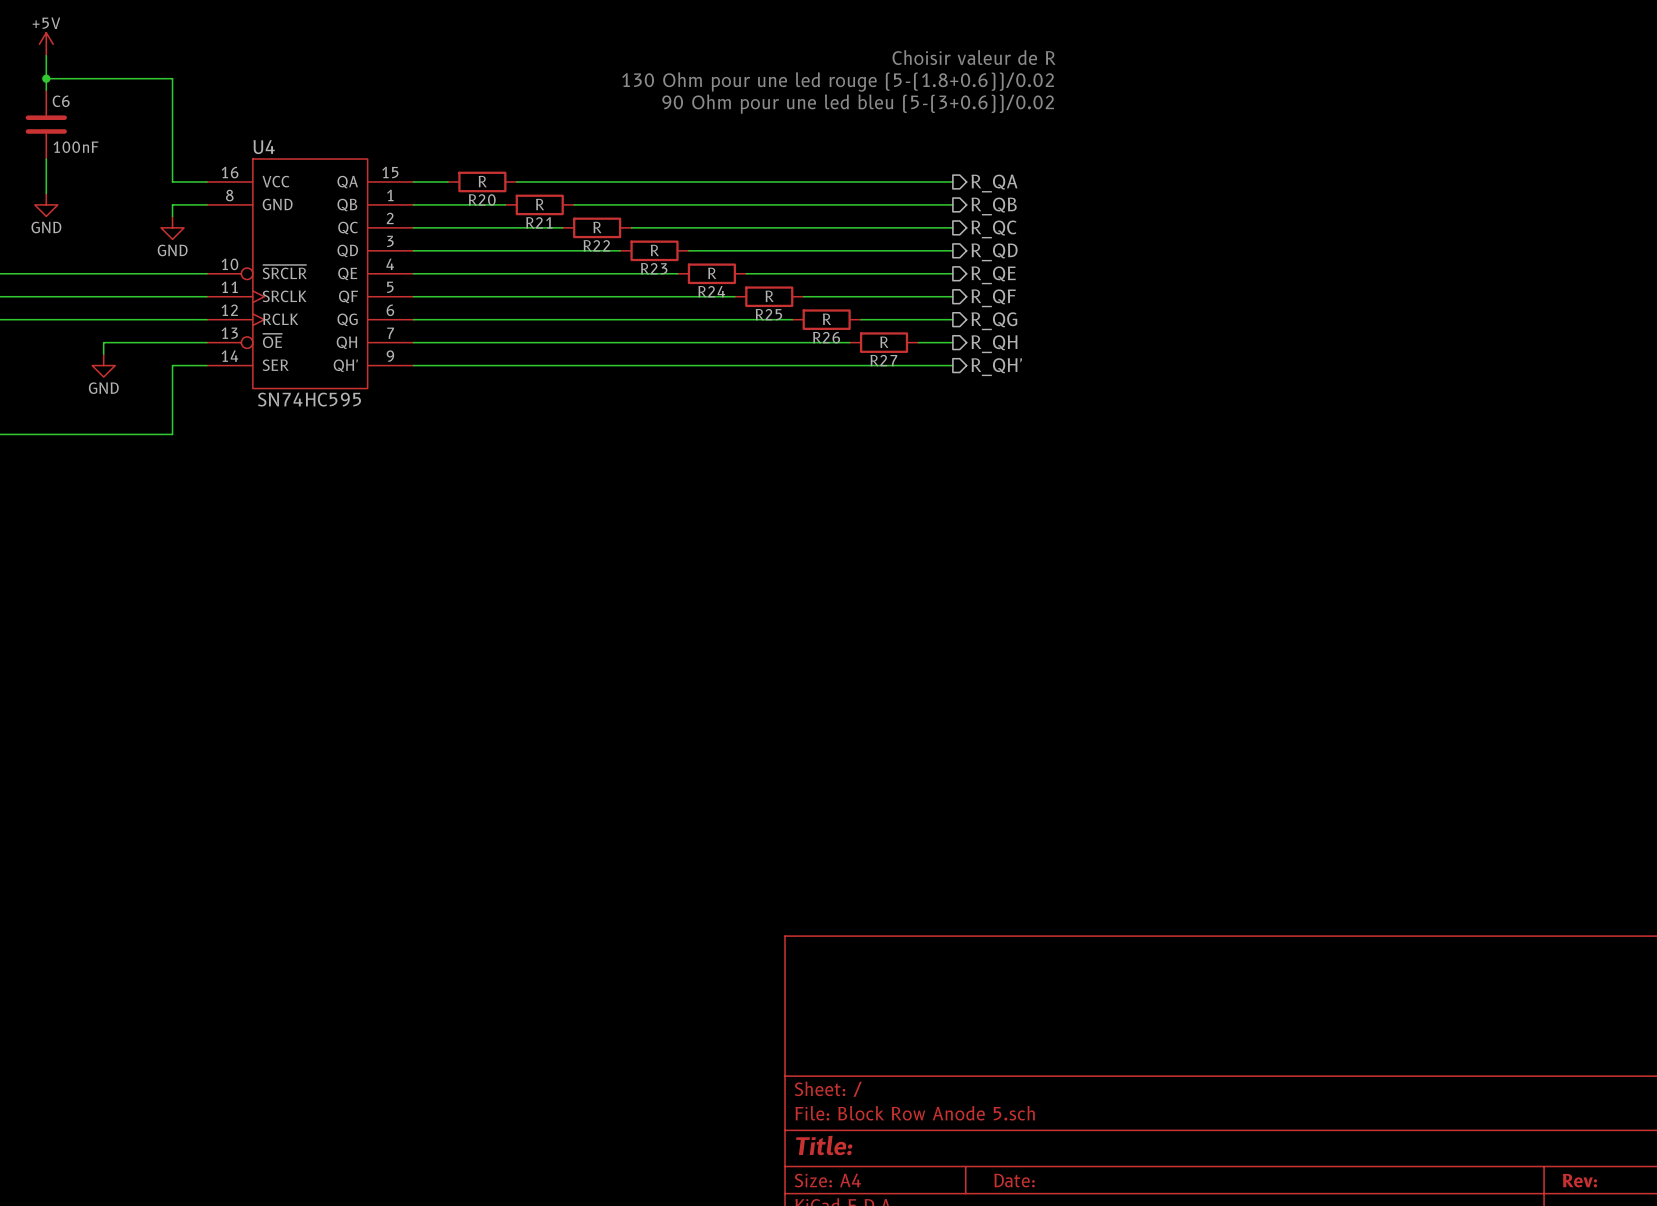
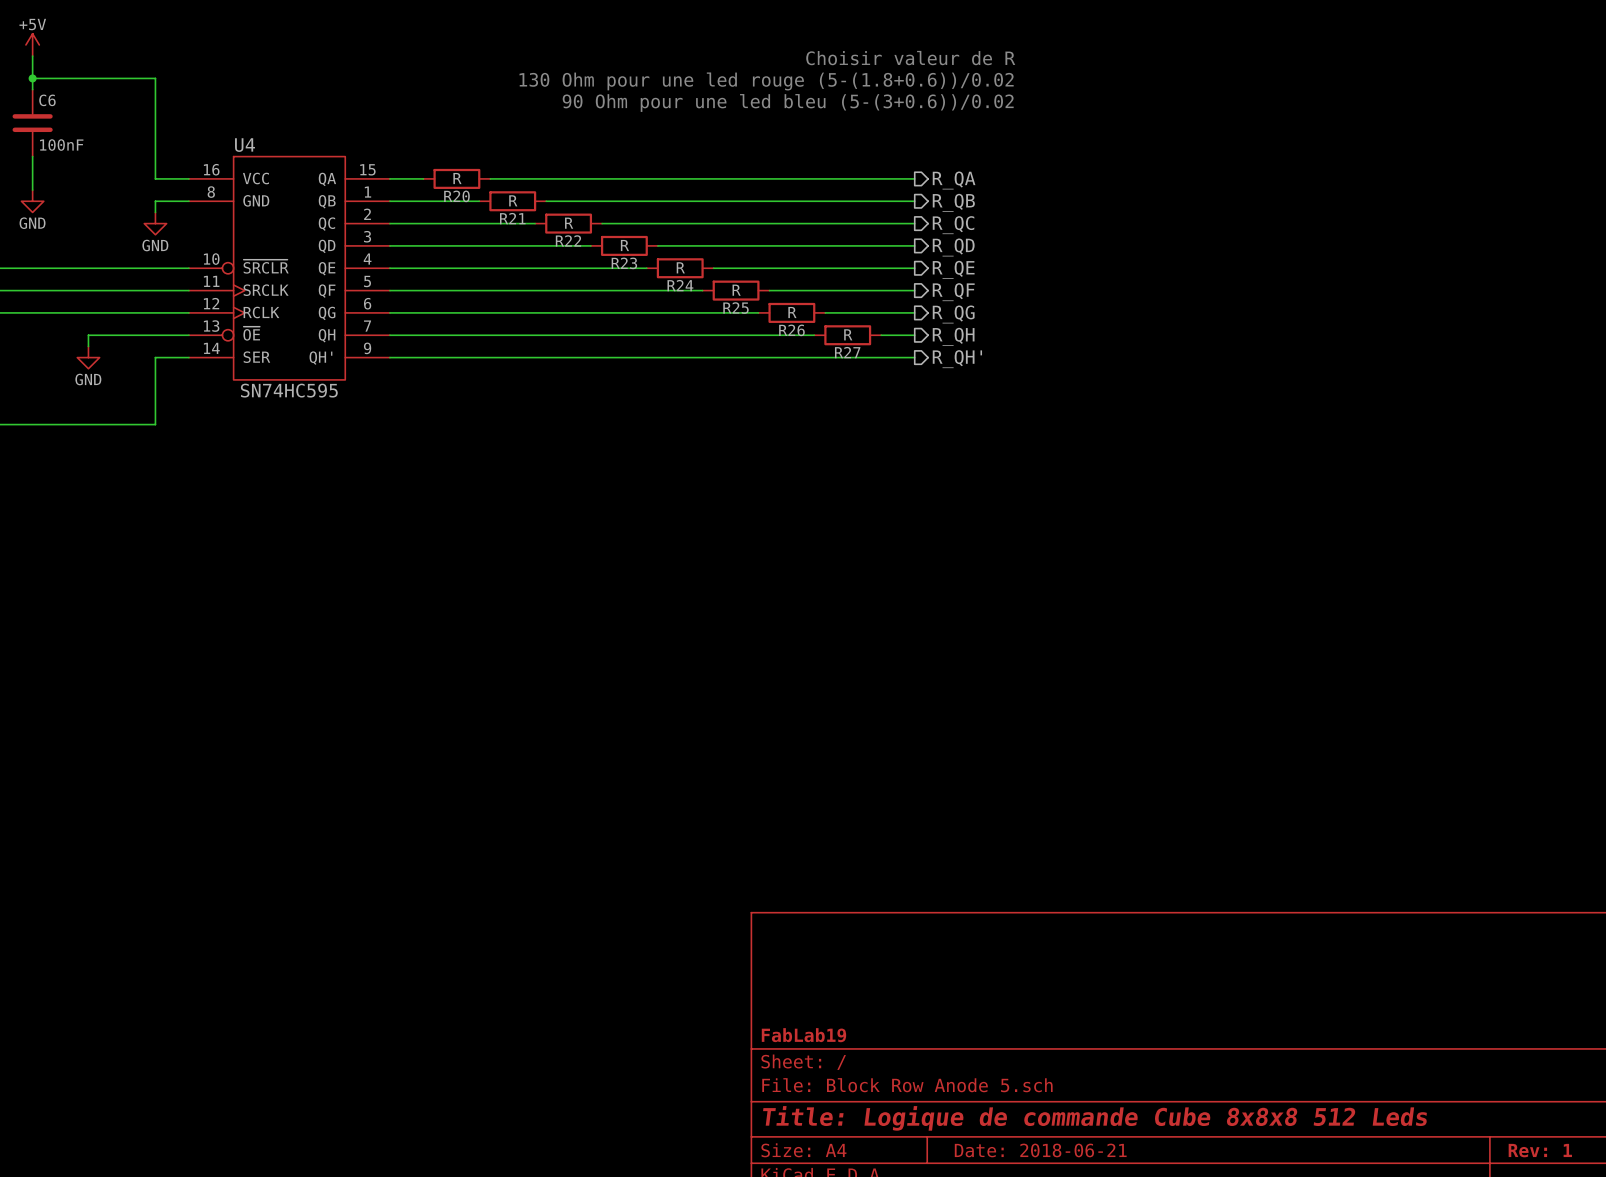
title block: none -> FabLab19 (803, 1035)
title block: Title: (824, 1145) -> Title: Logique de commande Cube 8x8x8 512 Leds (1094, 1118)
title block: Date: (1014, 1180) -> Date: 2018-06-21 (1040, 1150)
title block: Rev: (1579, 1180) -> Rev: 1 (1540, 1150)

